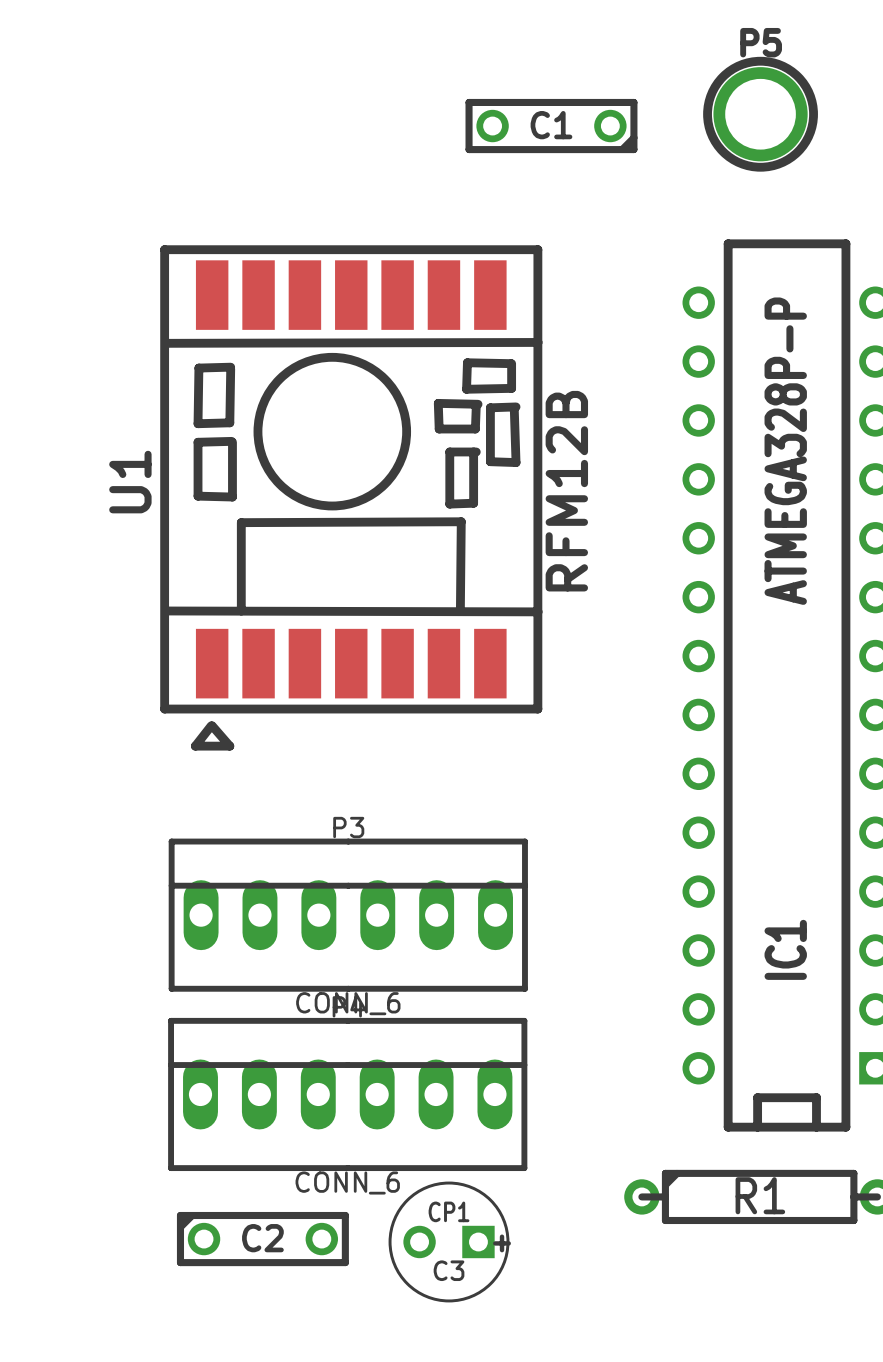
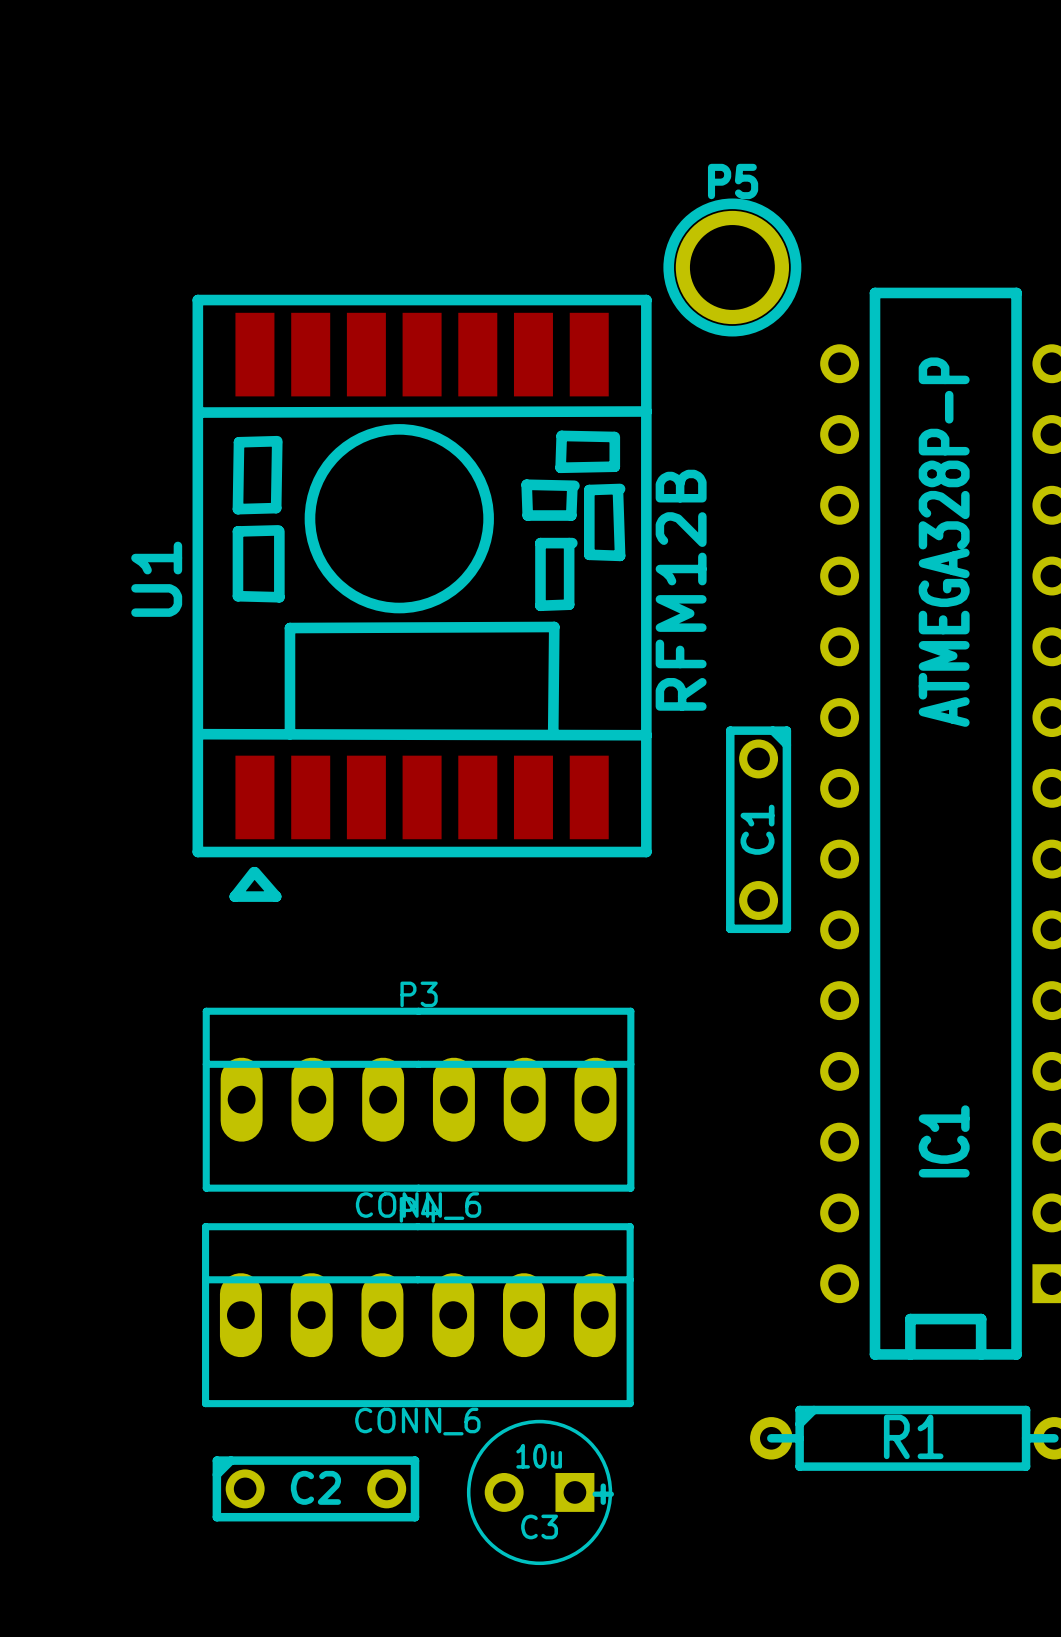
P5 position: (760, 114) -> (732, 267)
C1 rotation: 0° (551, 126) -> 90° counterclockwise (758, 829)
C1 position: (551, 126) -> (758, 829)
C3 value: CP1 (449, 1211) -> 10u (539, 1456)

